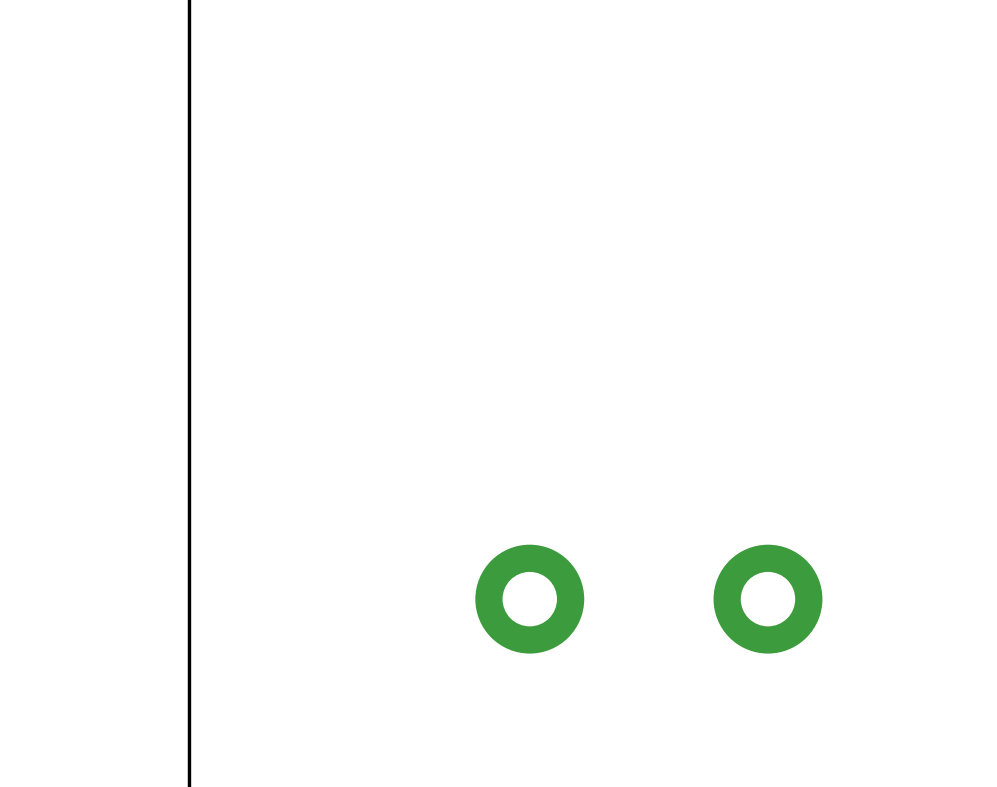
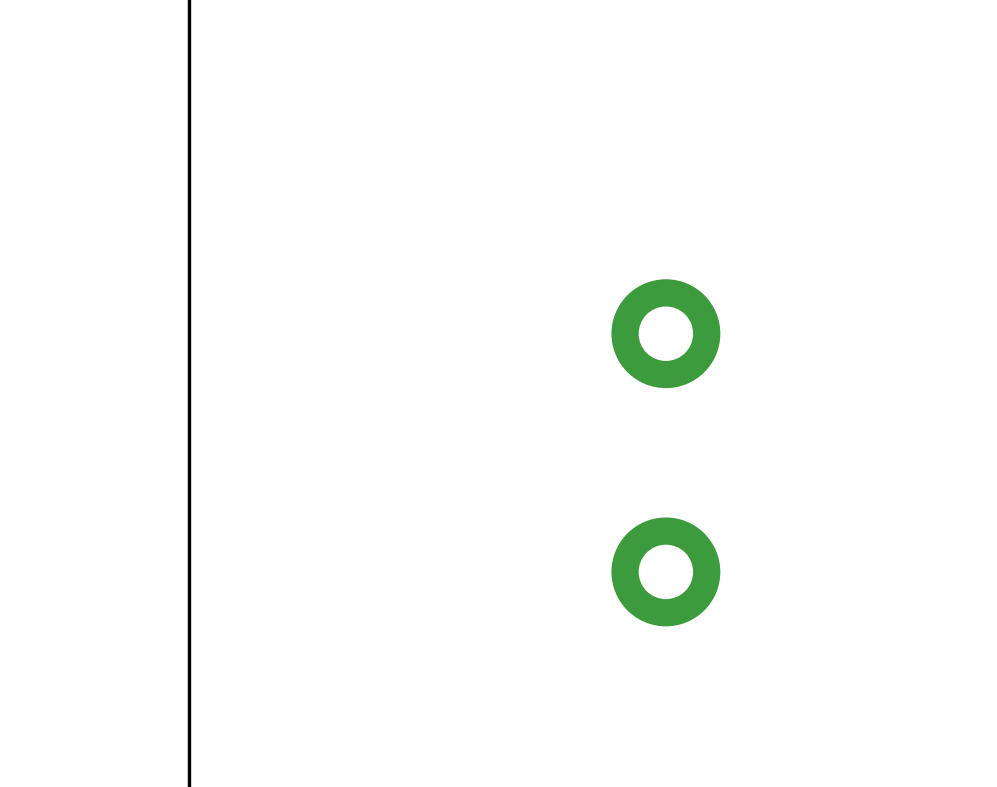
part rotation: 0° (648, 599) -> 90° clockwise (665, 452)

